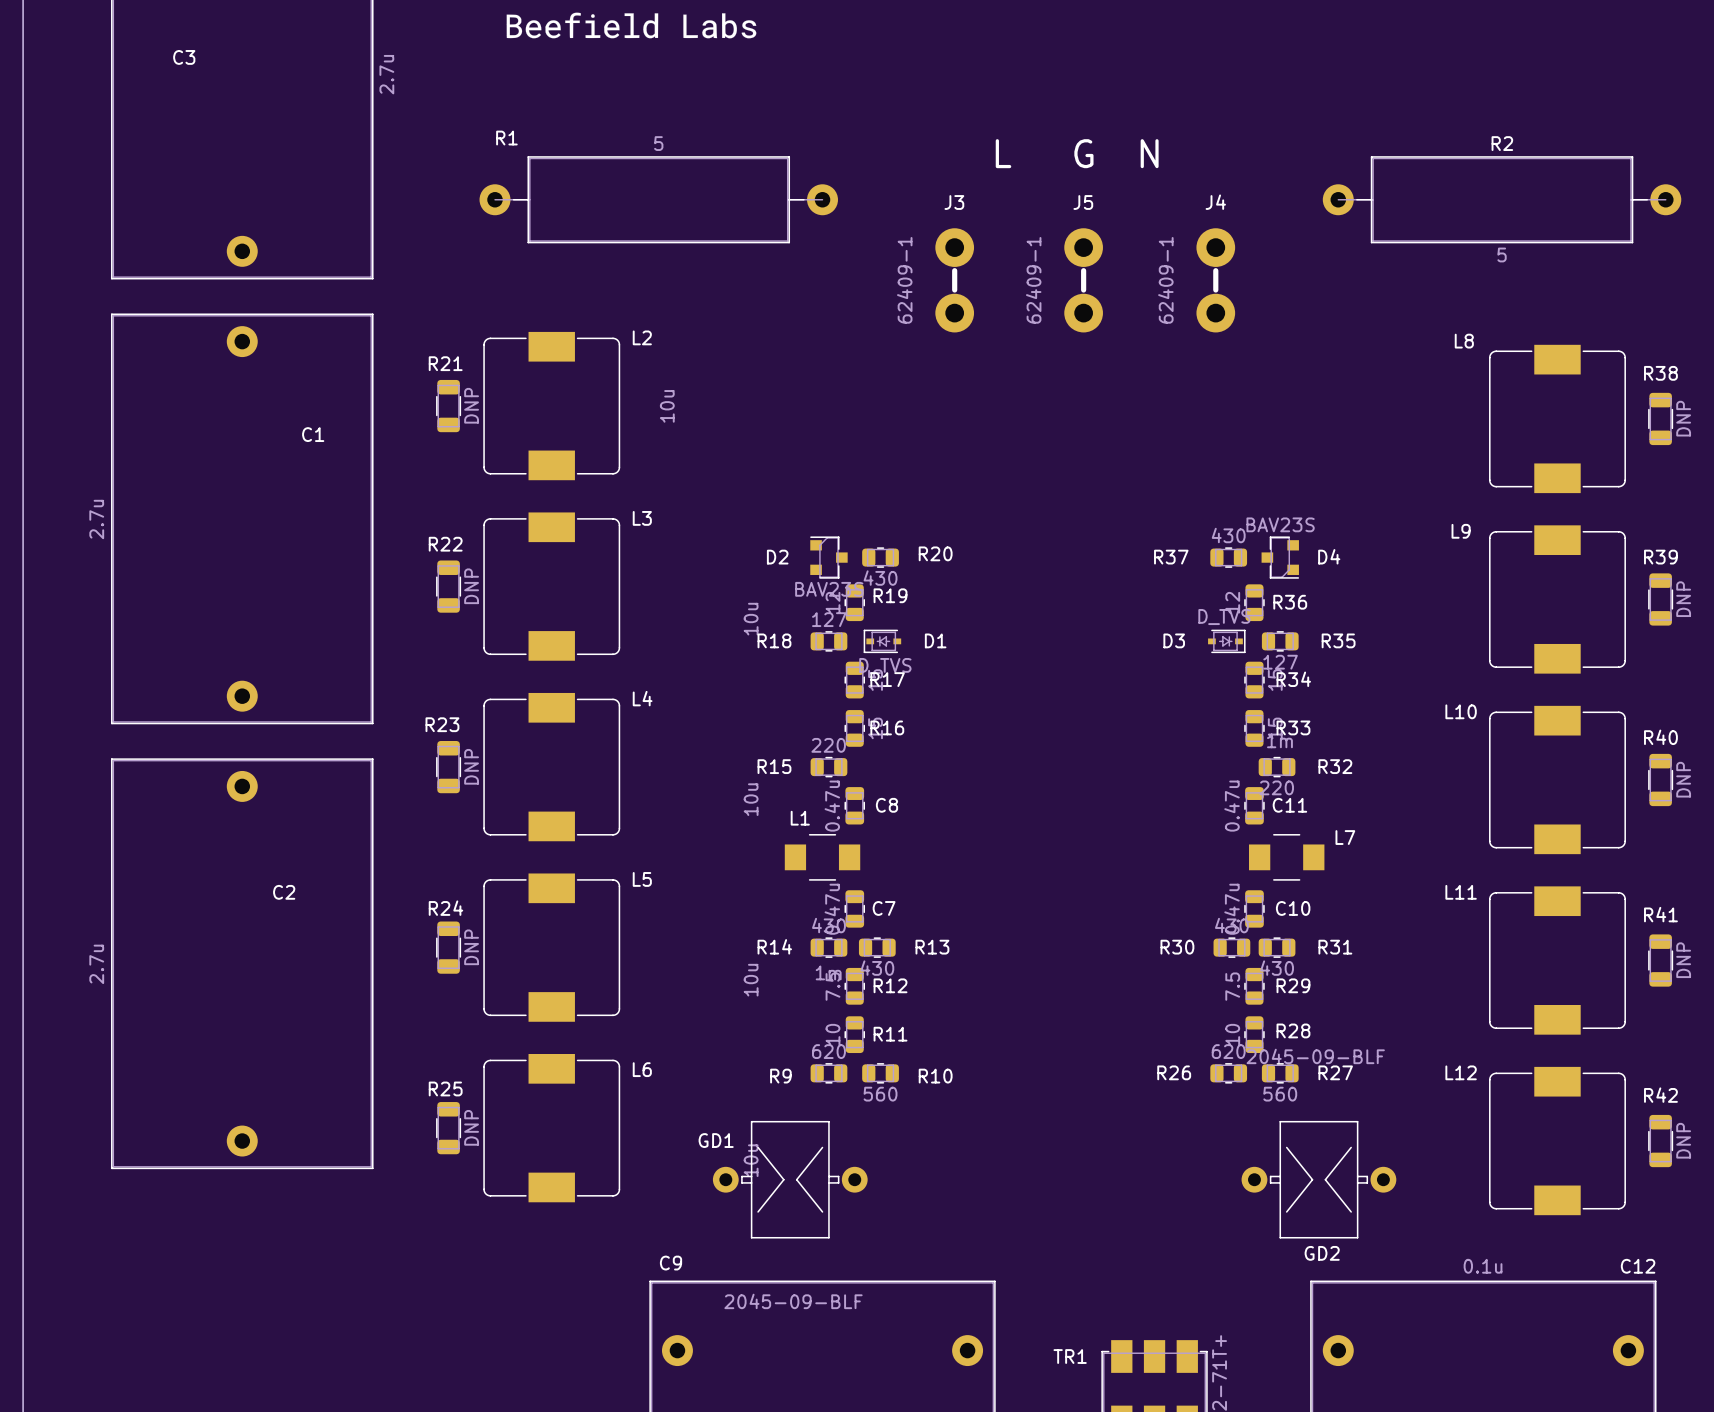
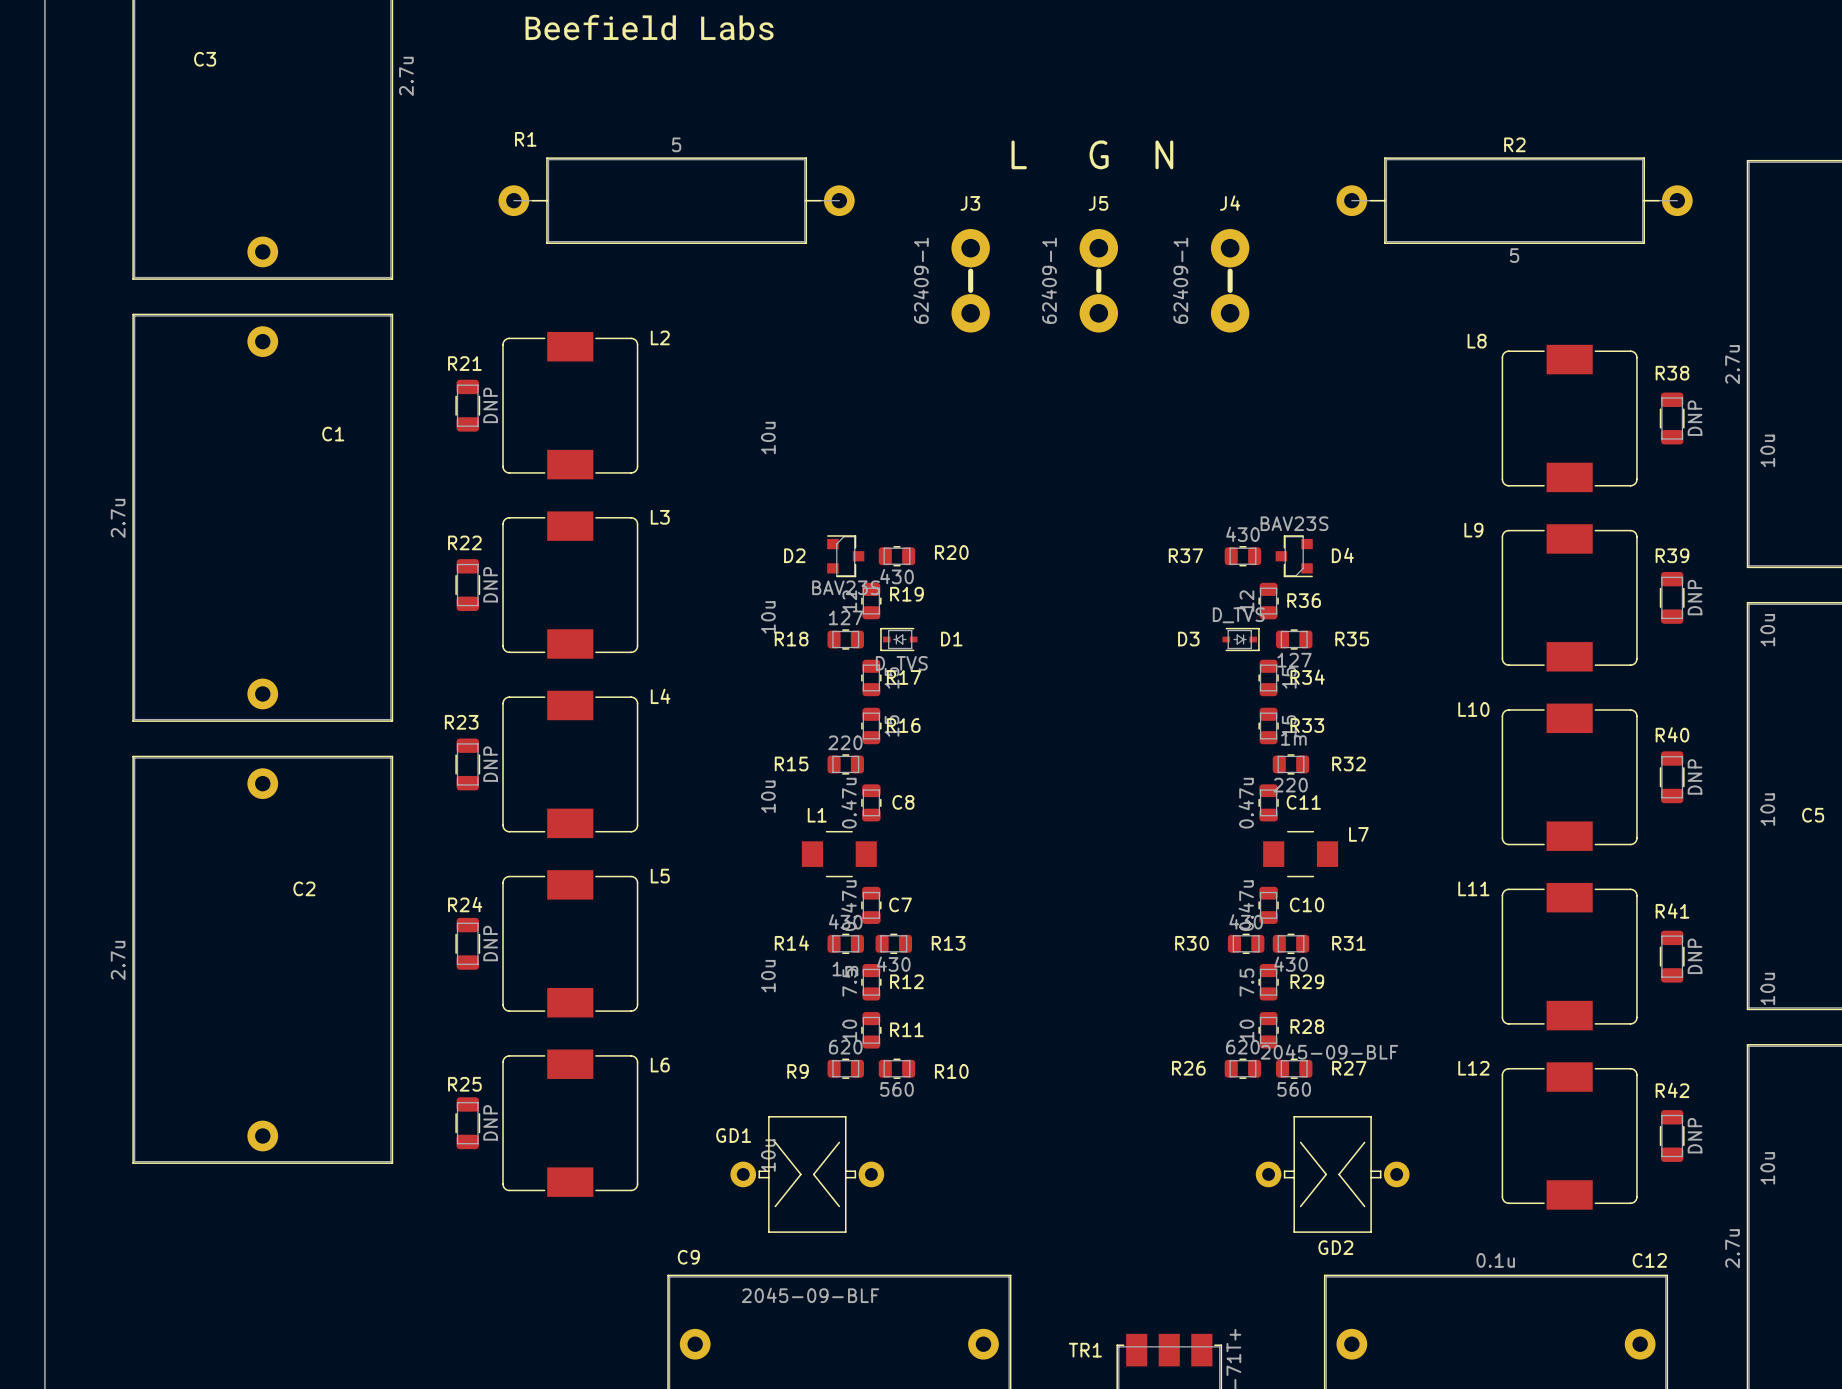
L2 value position: 10u (667, 406) -> 10u (768, 438)

